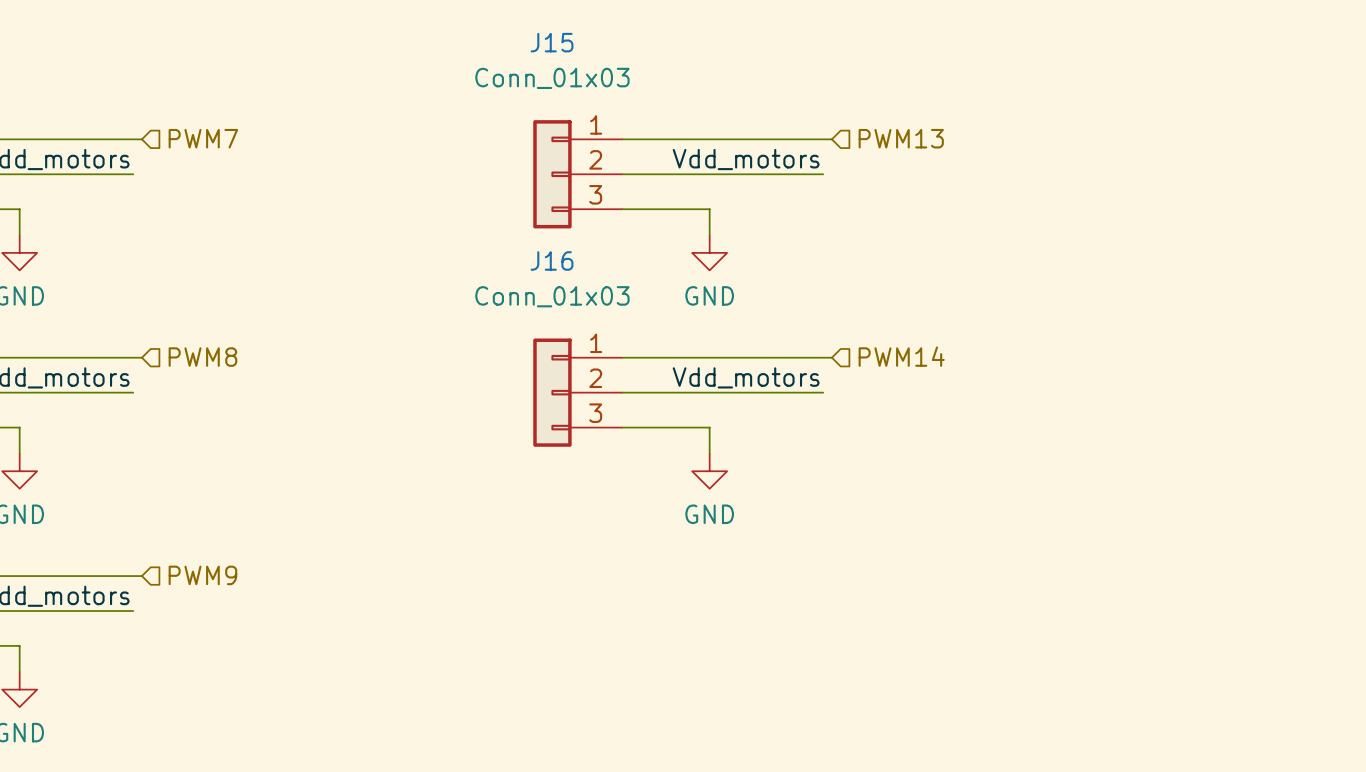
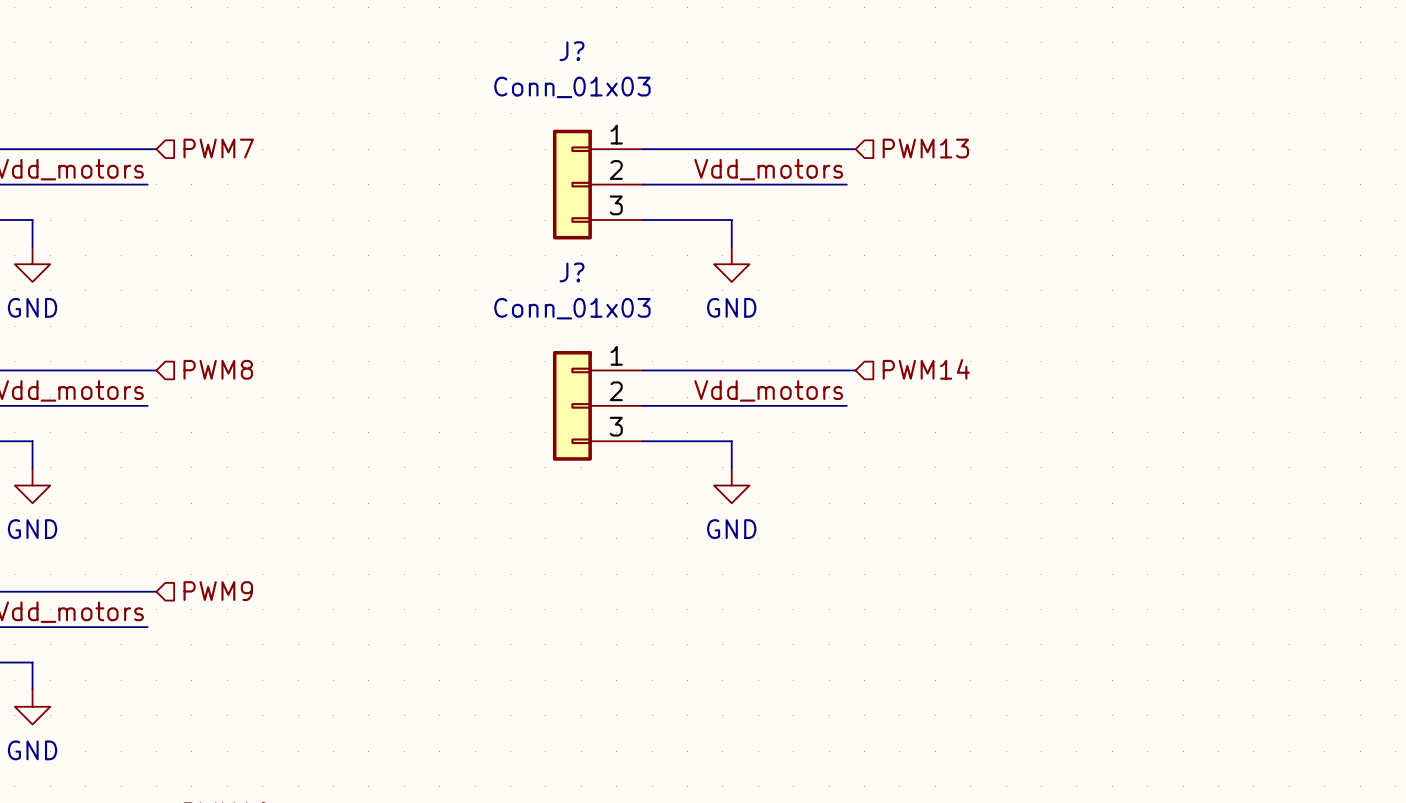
J15 name: J15 (552, 42) -> J? (572, 51)
J16 name: J16 (552, 260) -> J? (572, 272)

